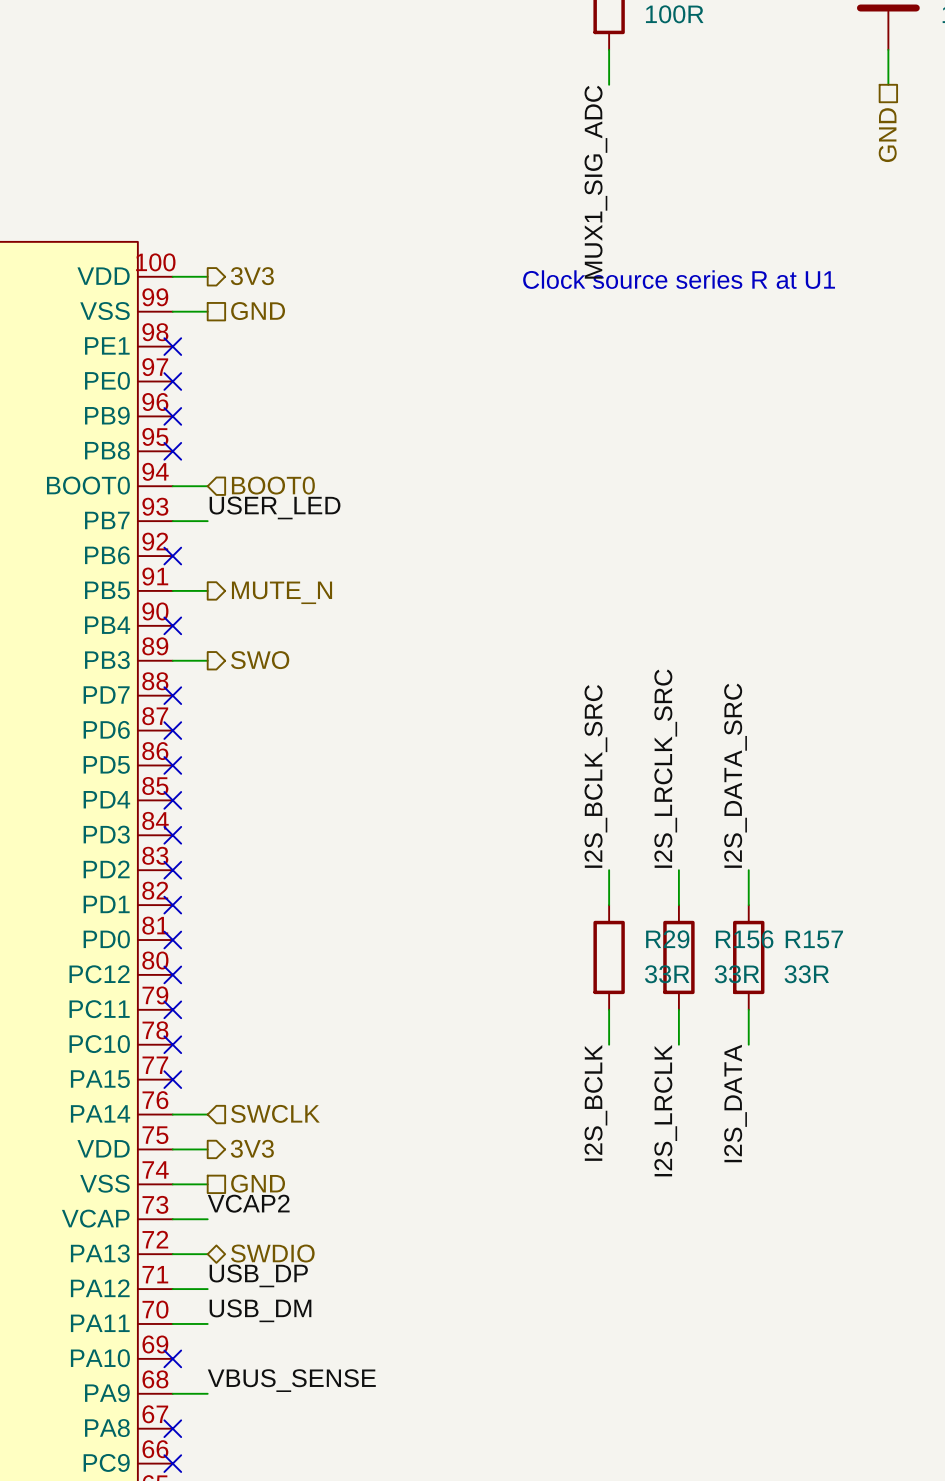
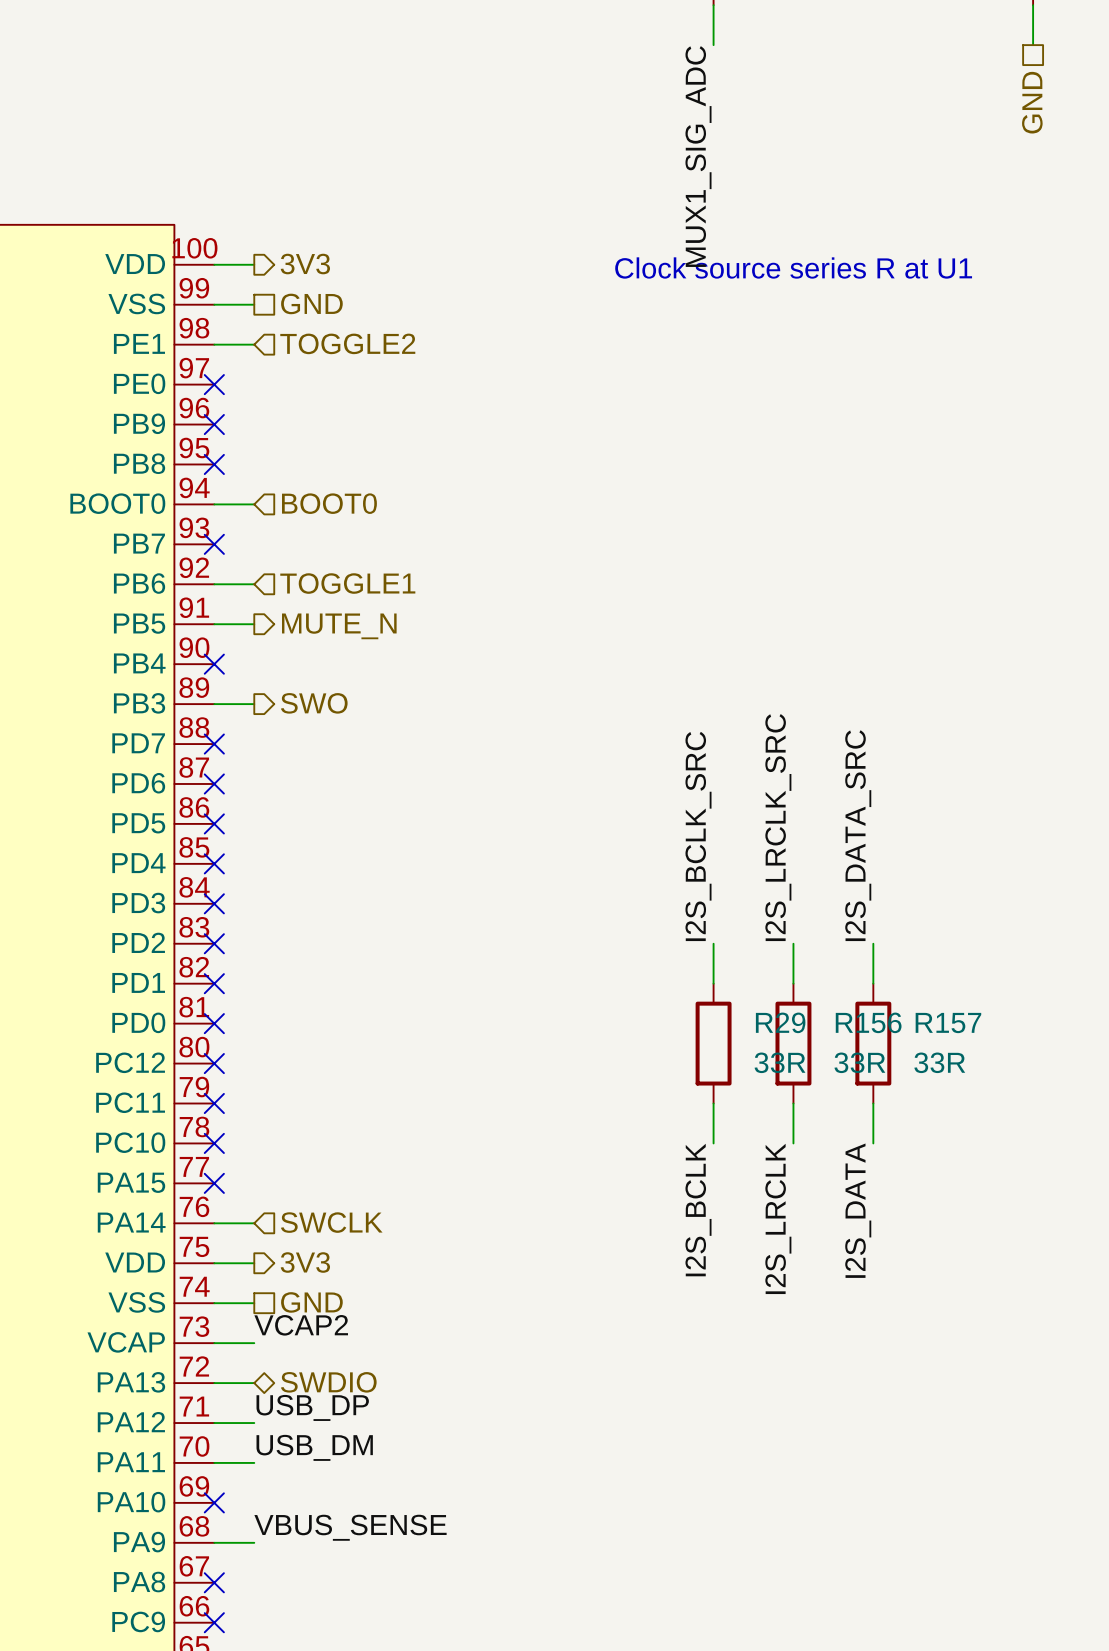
hierarchical label: none -> TOGGLE2 (347, 343)
wire: none -> (214, 344) (254, 344)
no-connect mark: (172, 346) -> none
label: USER_LED (275, 507) -> none
wire: (172, 521) (207, 521) -> (214, 584) (254, 584)
hierarchical label: none -> TOGGLE1 (347, 583)
no-connect mark position: (172, 556) -> (214, 544)

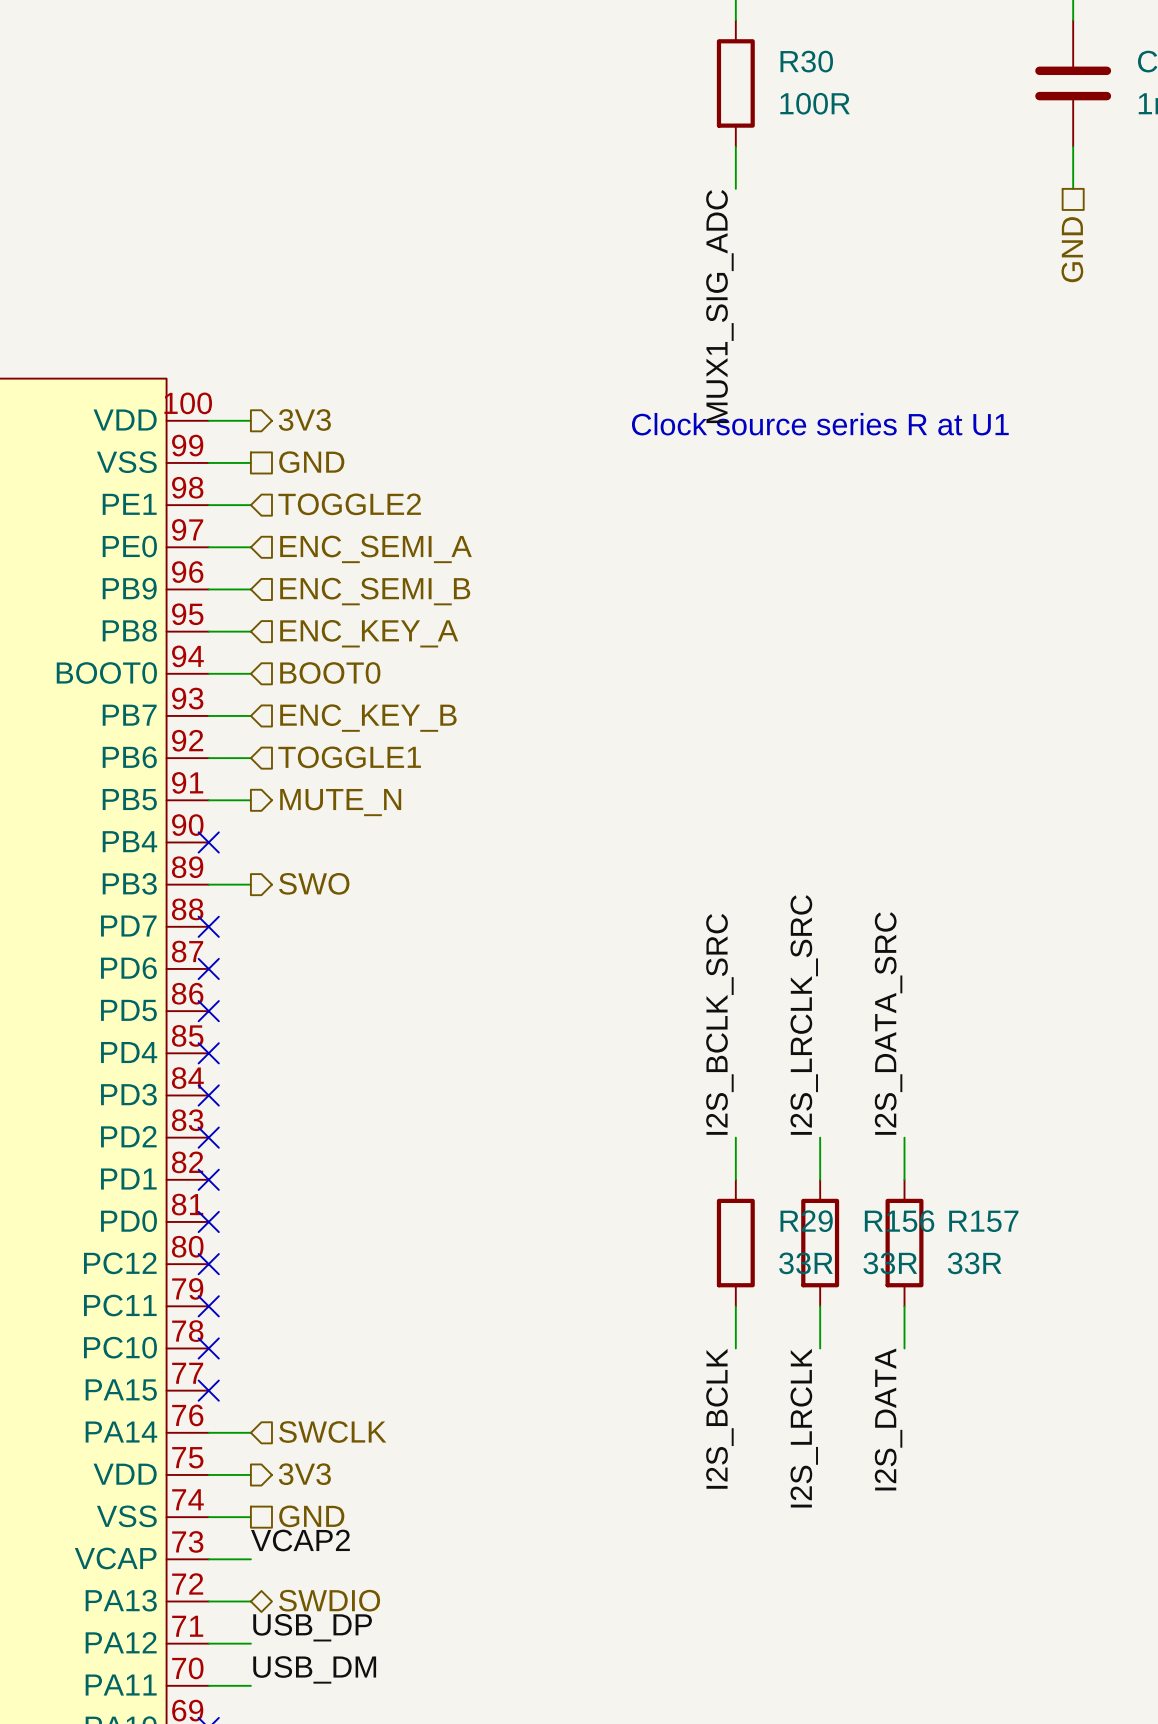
wire: none -> (208, 547) (250, 547)
no-connect mark: (214, 384) -> none
hierarchical label: none -> ENC_SEMI_A (375, 549)
wire: none -> (208, 589) (250, 589)
no-connect mark: (214, 424) -> none
hierarchical label: none -> ENC_SEMI_B (375, 591)
wire: none -> (208, 631) (250, 631)
no-connect mark: (214, 464) -> none
hierarchical label: none -> ENC_KEY_A (369, 633)
wire: none -> (208, 715) (250, 715)
no-connect mark: (214, 544) -> none
hierarchical label: none -> ENC_KEY_B (368, 718)

